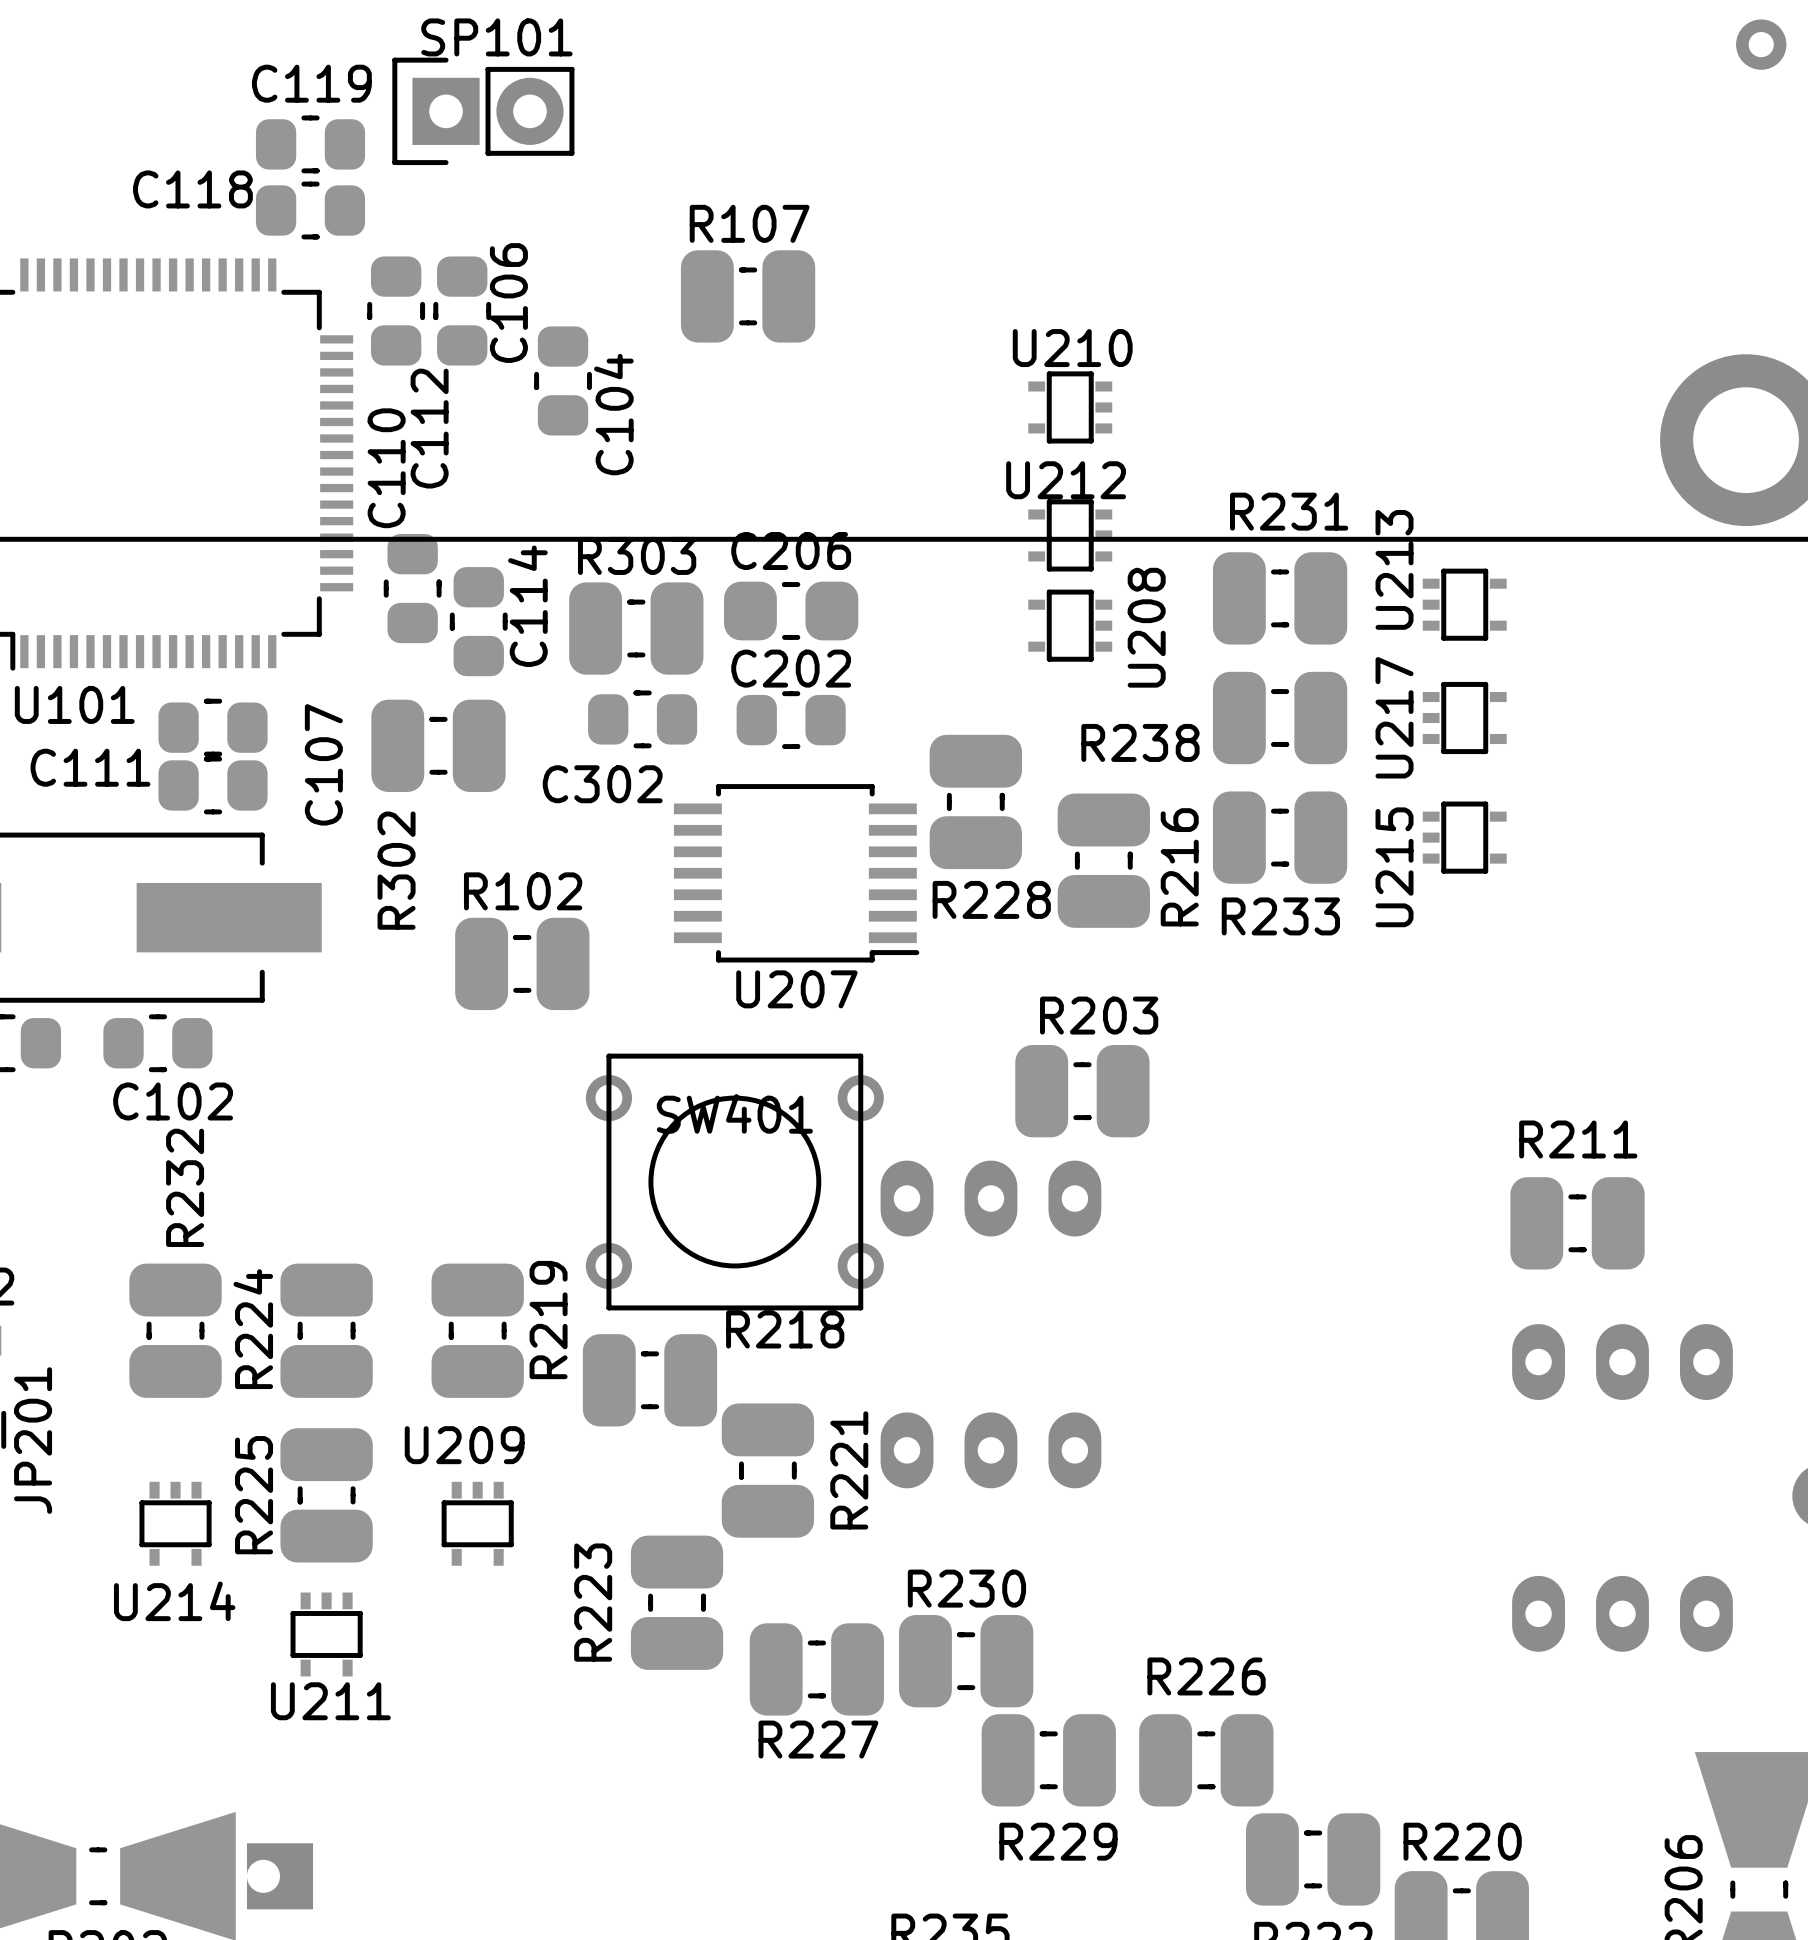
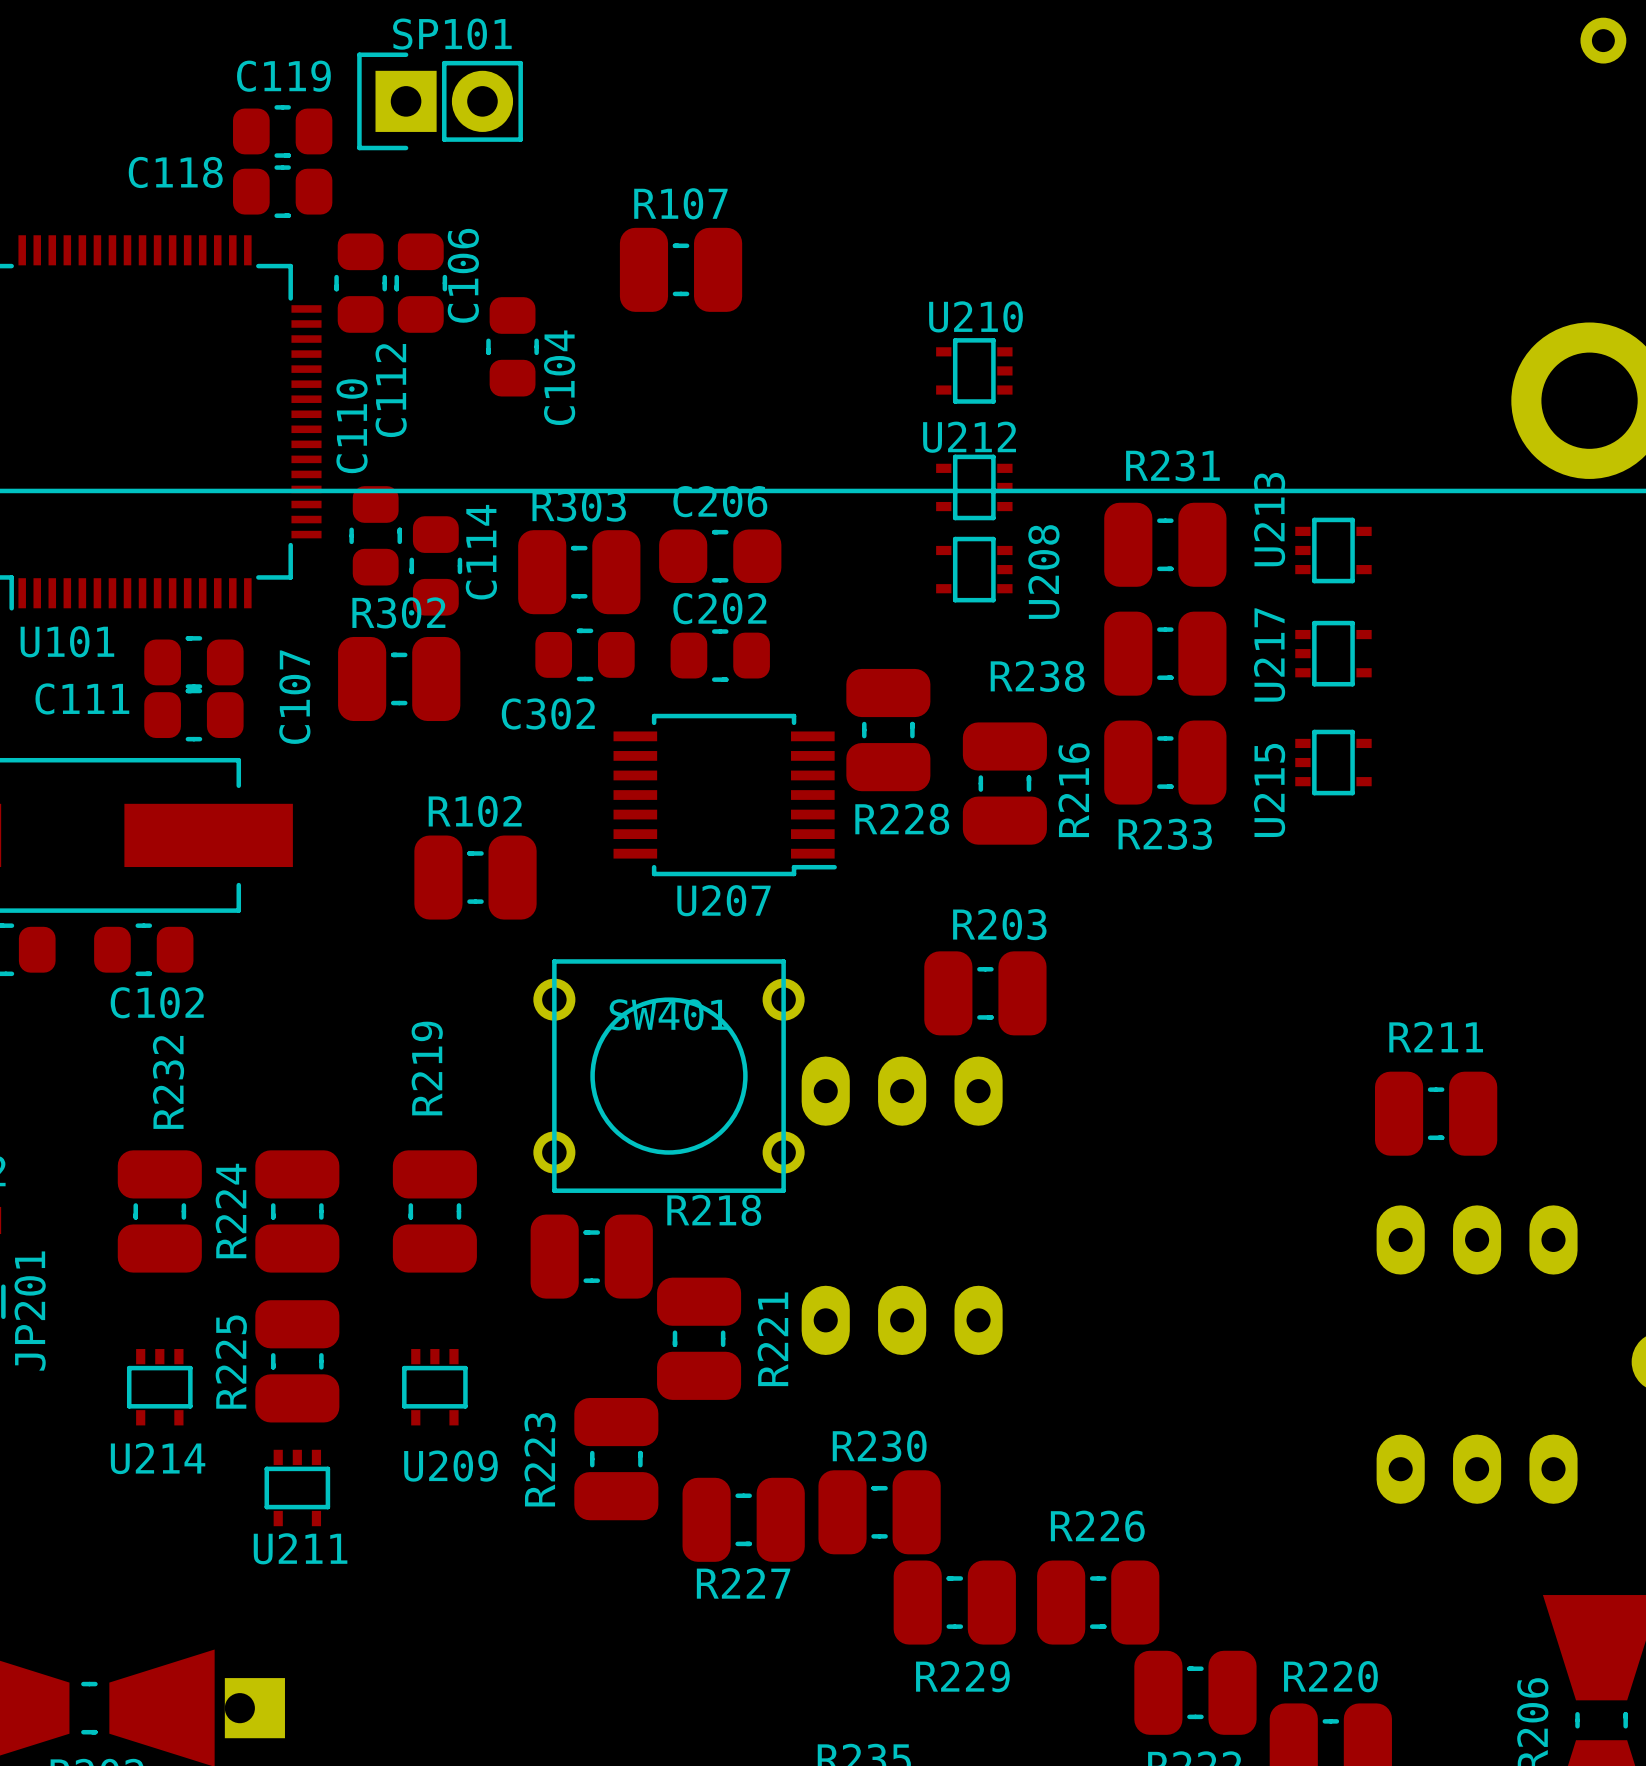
R302 name rotation: 0° (396, 870) -> 90° clockwise (398, 612)
R302 name position: R302 (396, 870) -> R302 (398, 612)
R219 name position: R219 (548, 1320) -> R219 (427, 1068)
U209 name position: U209 (464, 1445) -> U209 (450, 1466)

